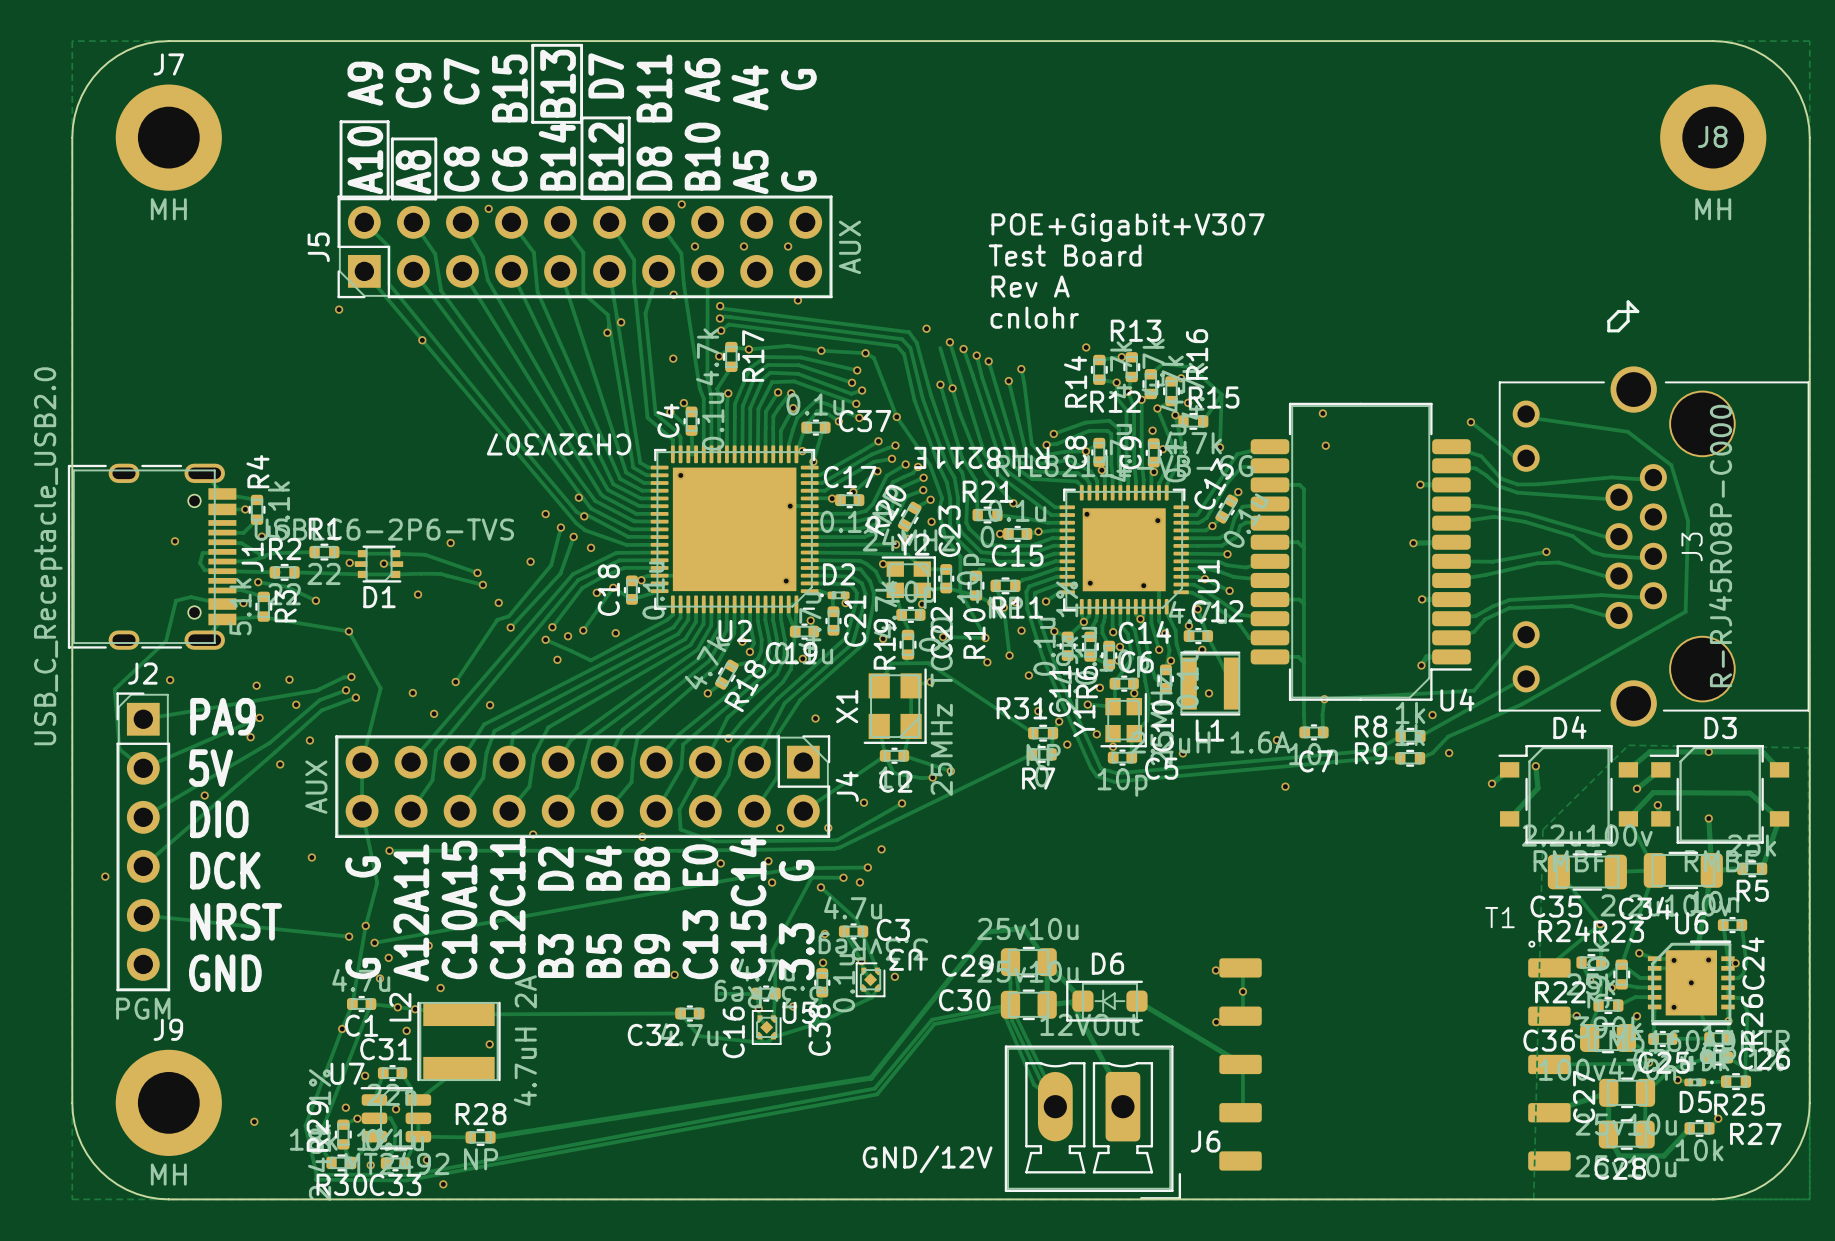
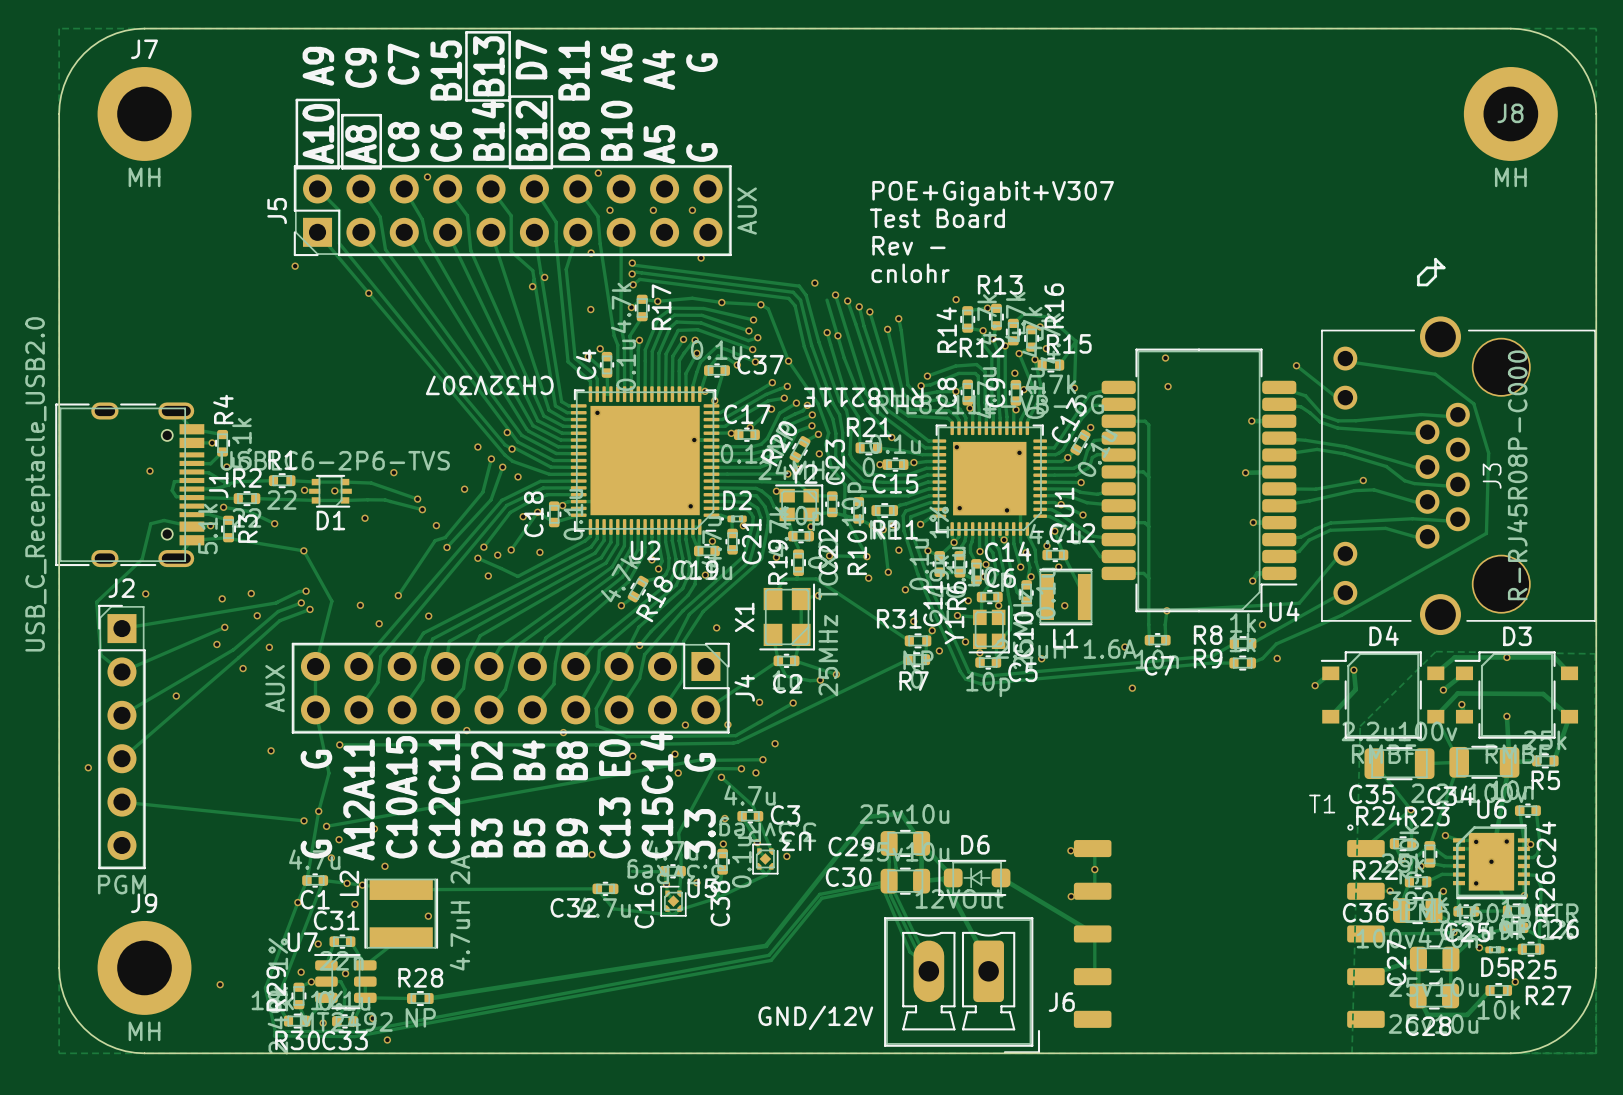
text: Rev A (1030, 286) -> Rev - (908, 245)
text: PA9 (222, 716) -> none
text: 5V (211, 768) -> none
text: DIO (219, 819) -> none
text: DCK (225, 870) -> none
text: NRST (236, 921) -> none
text: GND (225, 973) -> none

